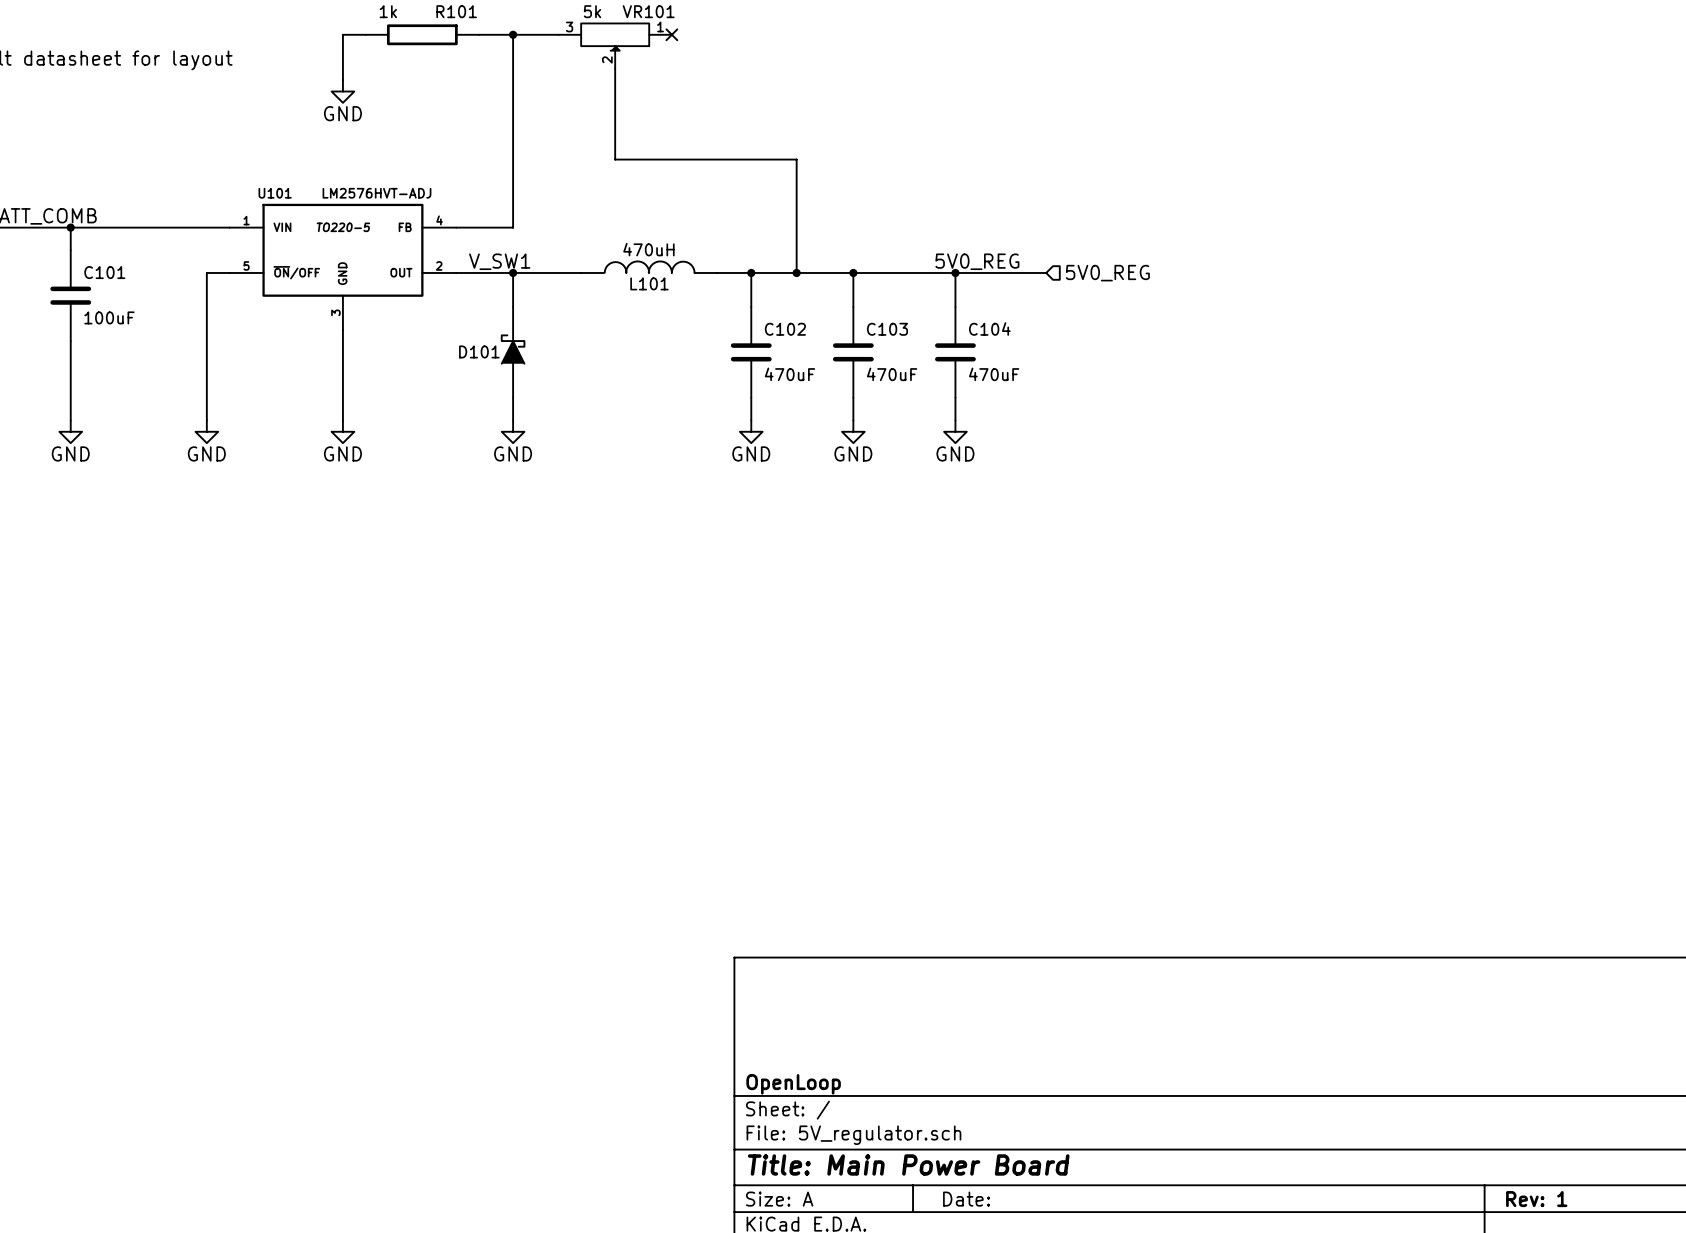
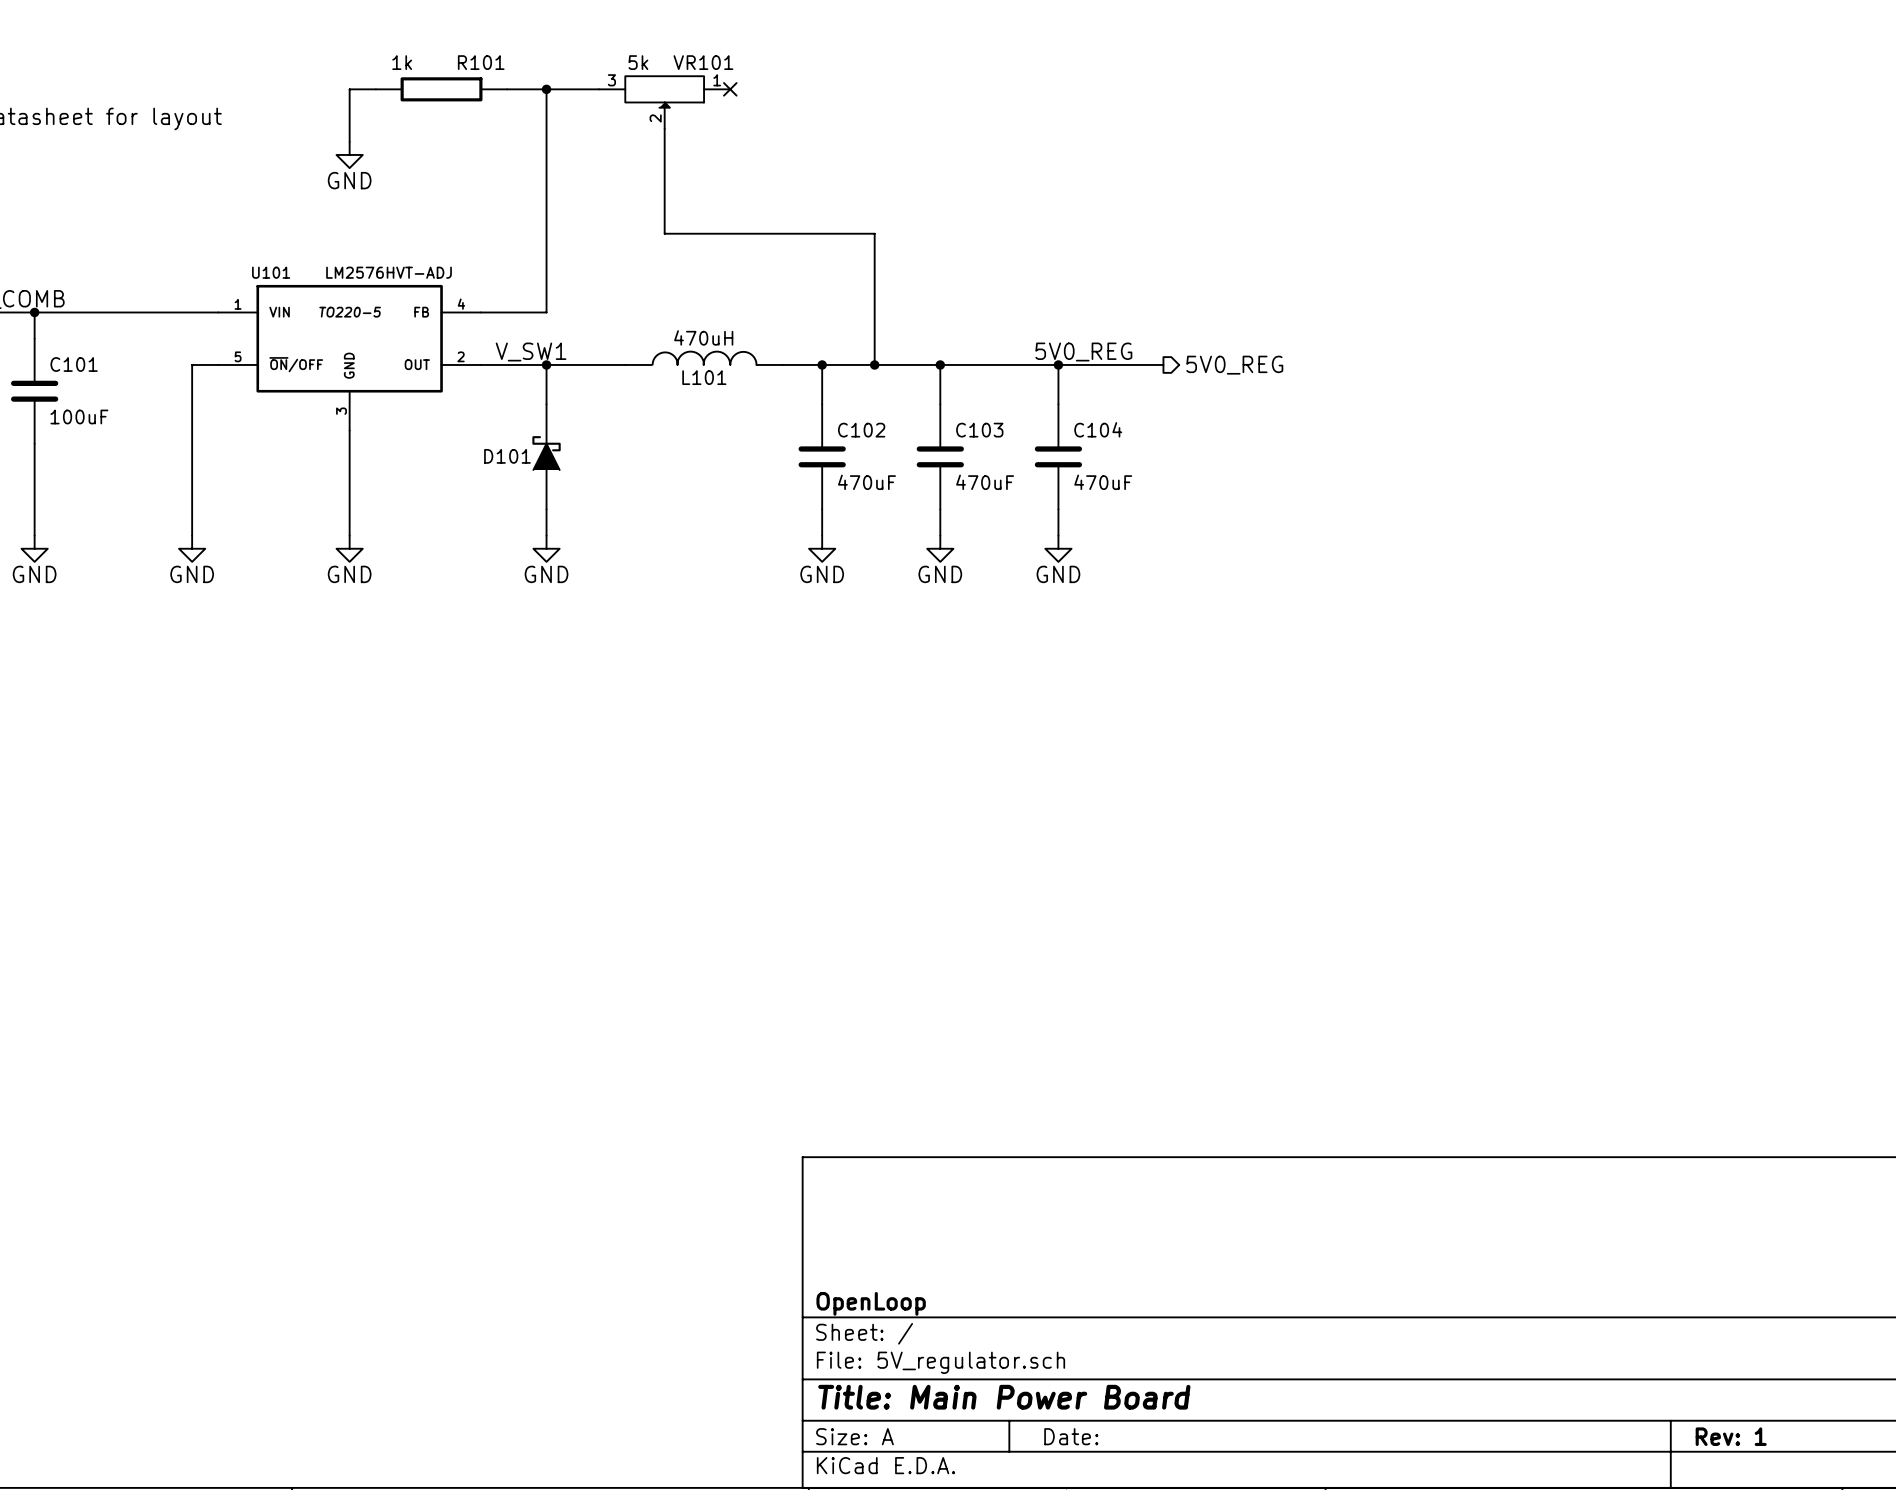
hierarchical label shape: input (1107, 273) -> output (1234, 365)

